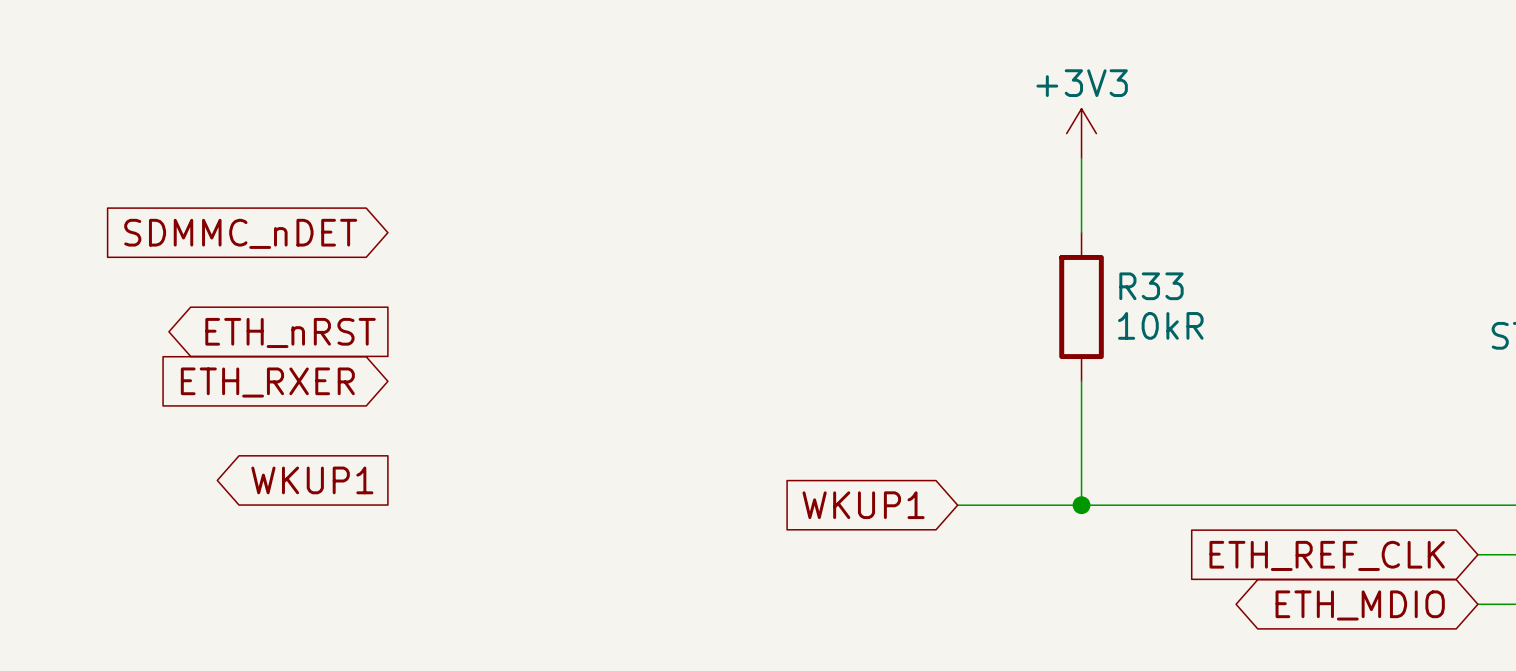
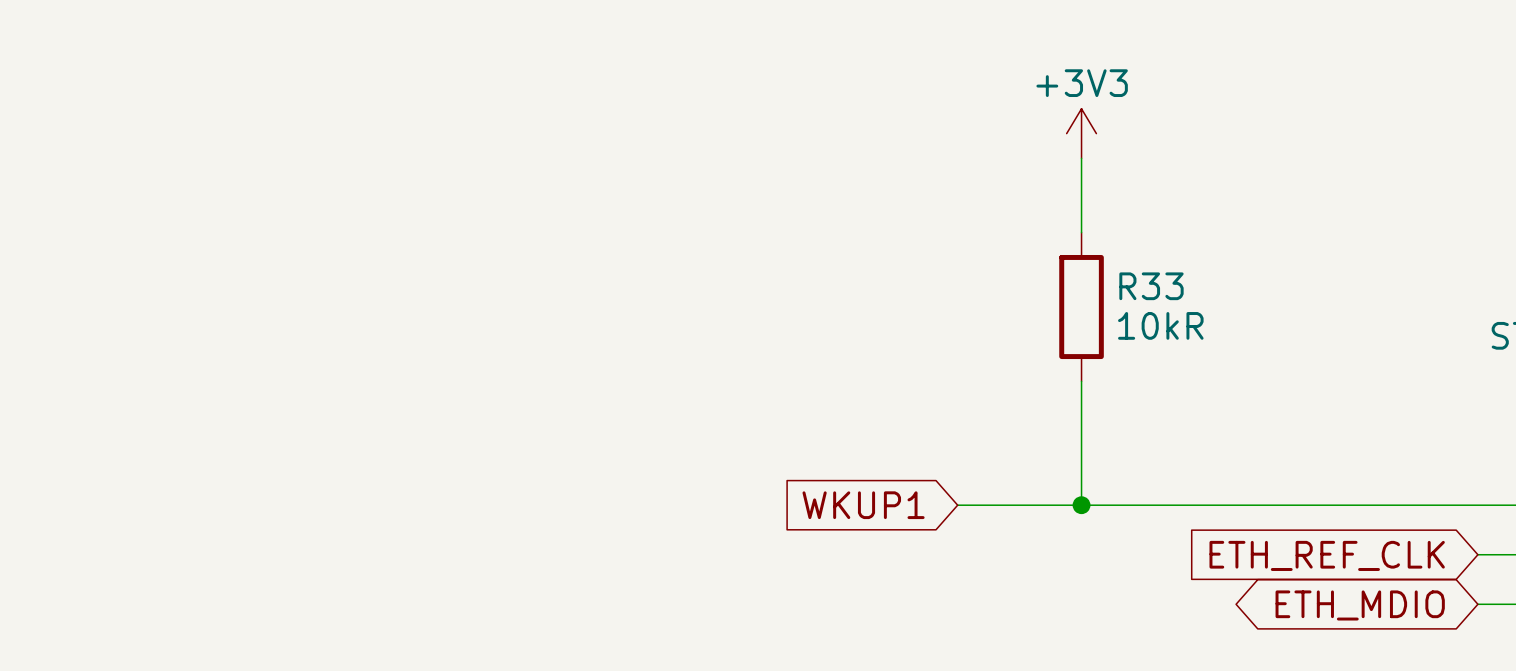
global label: SDMMC_nDET (240, 233) -> none
global label: ETH_nRST (290, 332) -> none
global label: ETH_RXER (267, 382) -> none
global label: WKUP1 (312, 480) -> none

